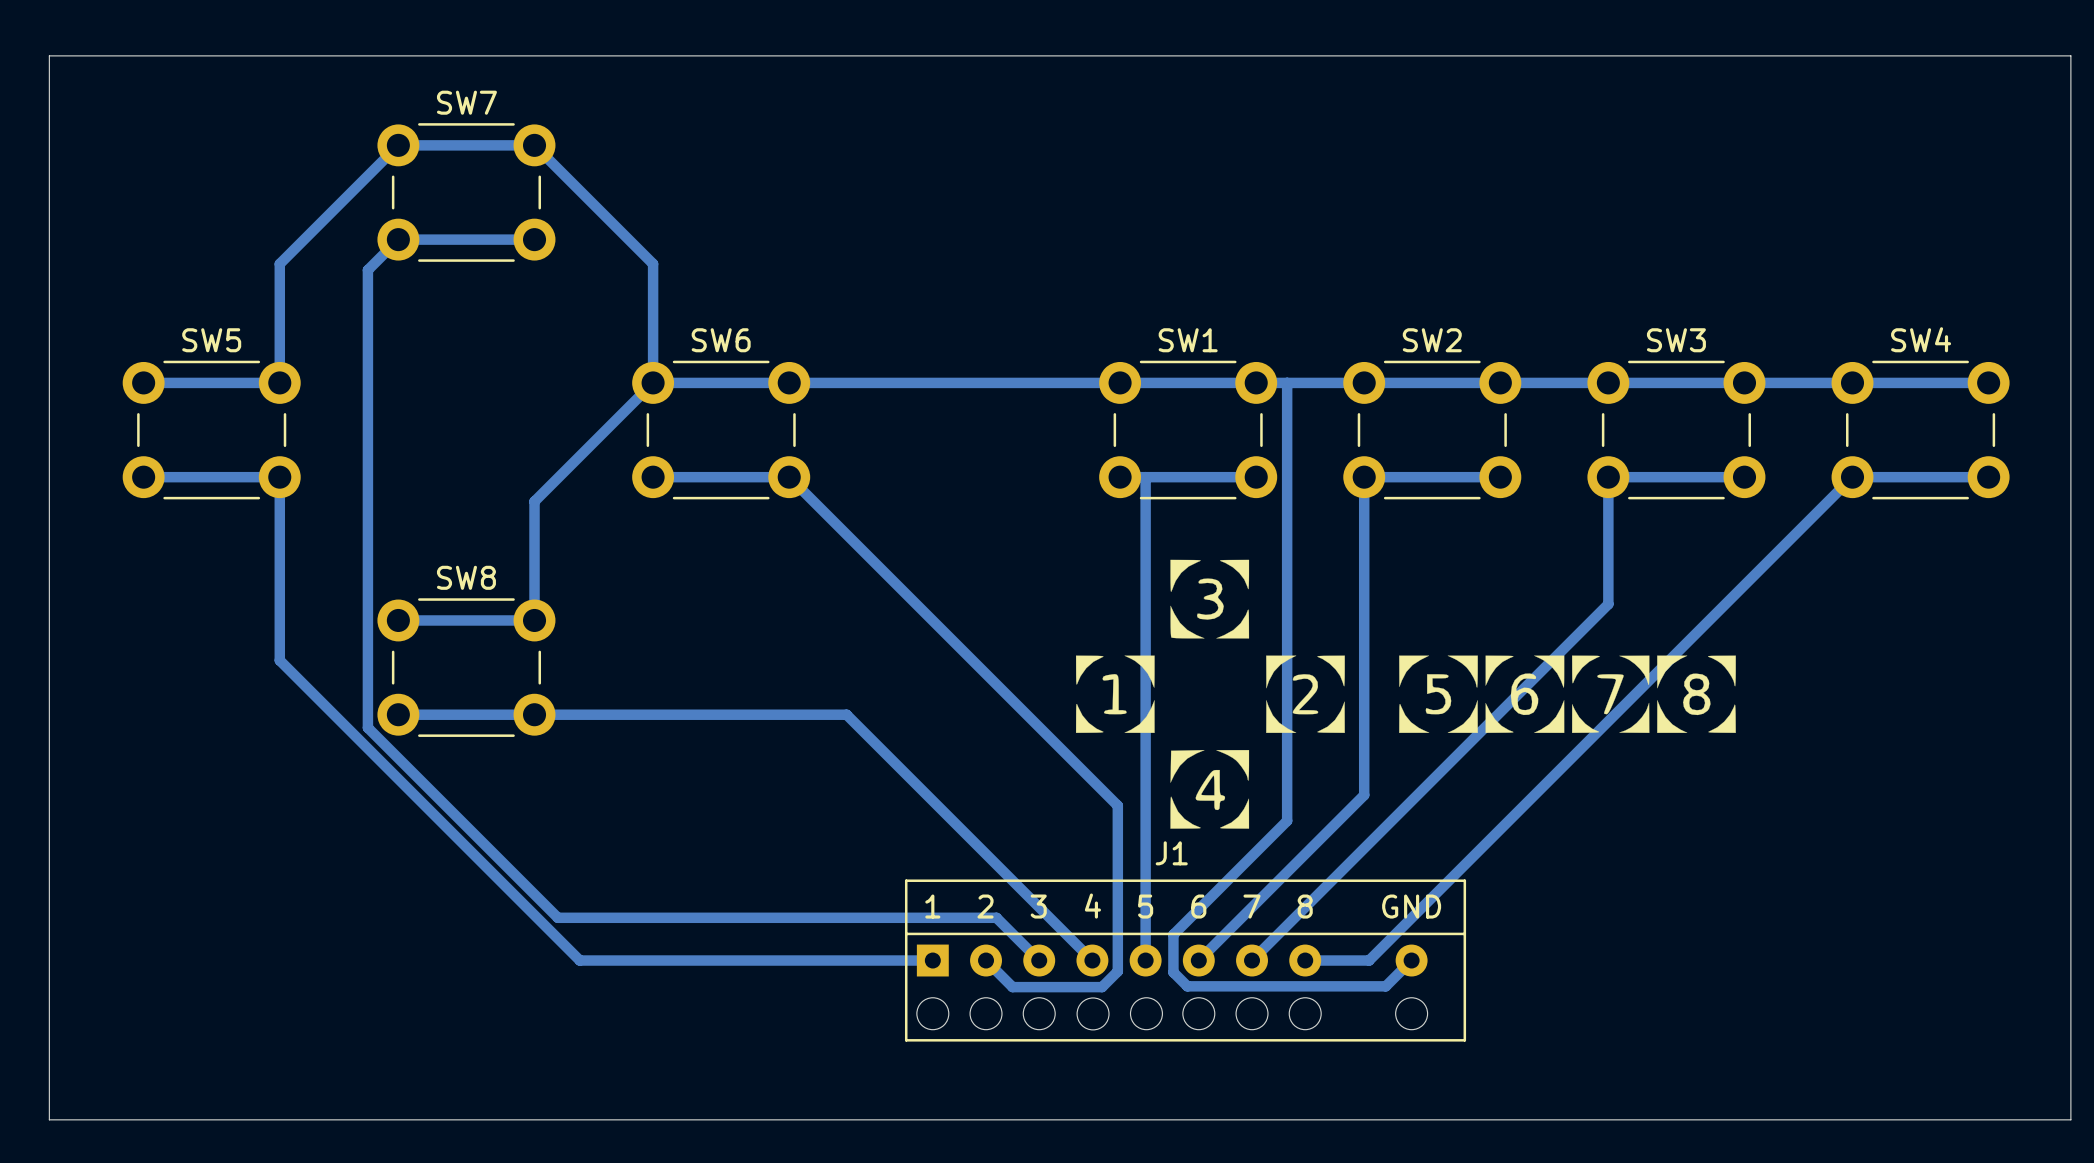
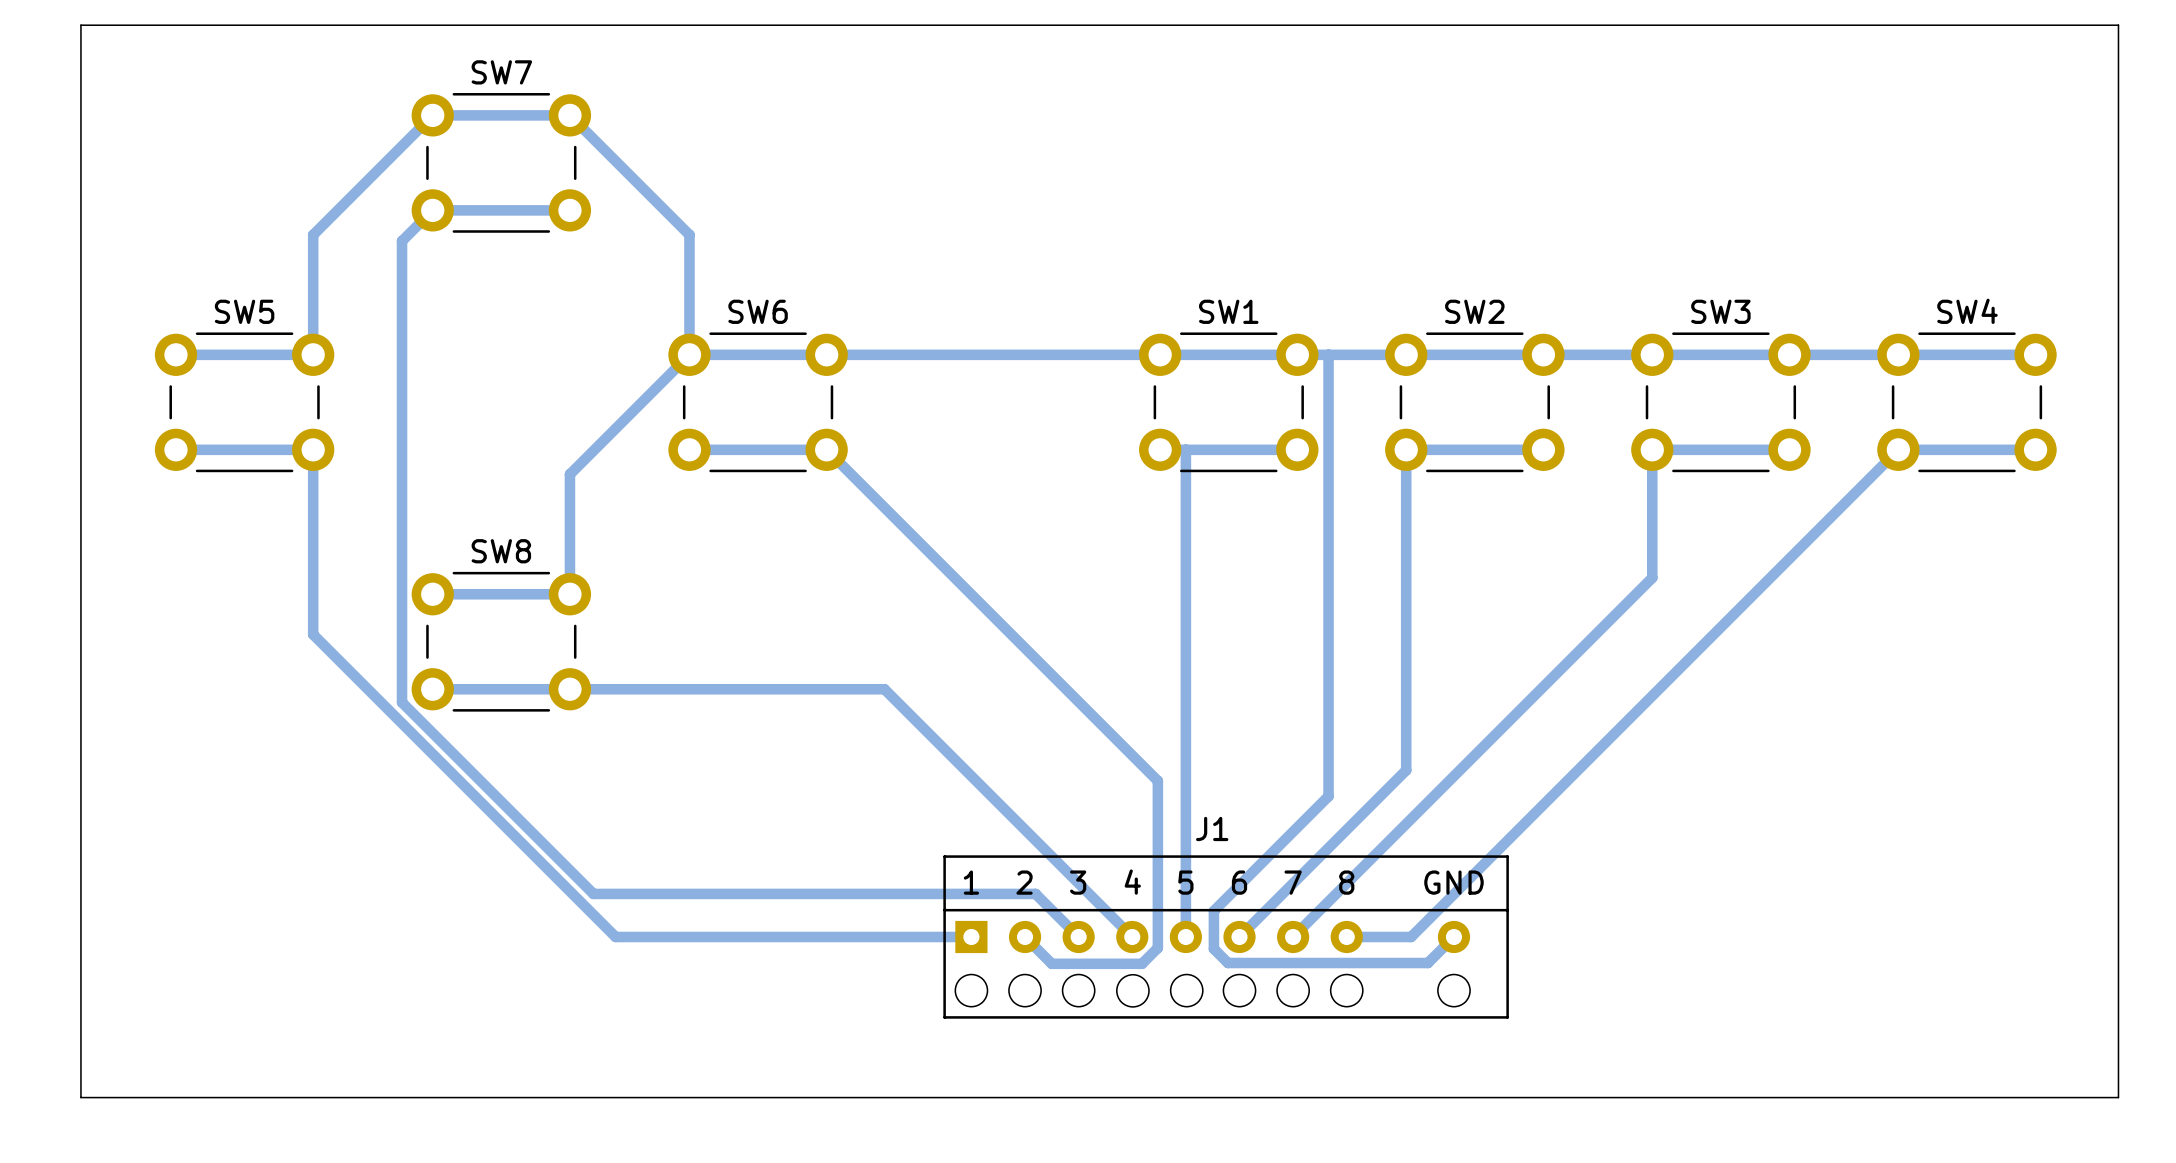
drawing: [1075, 559, 1736, 829] -> none

